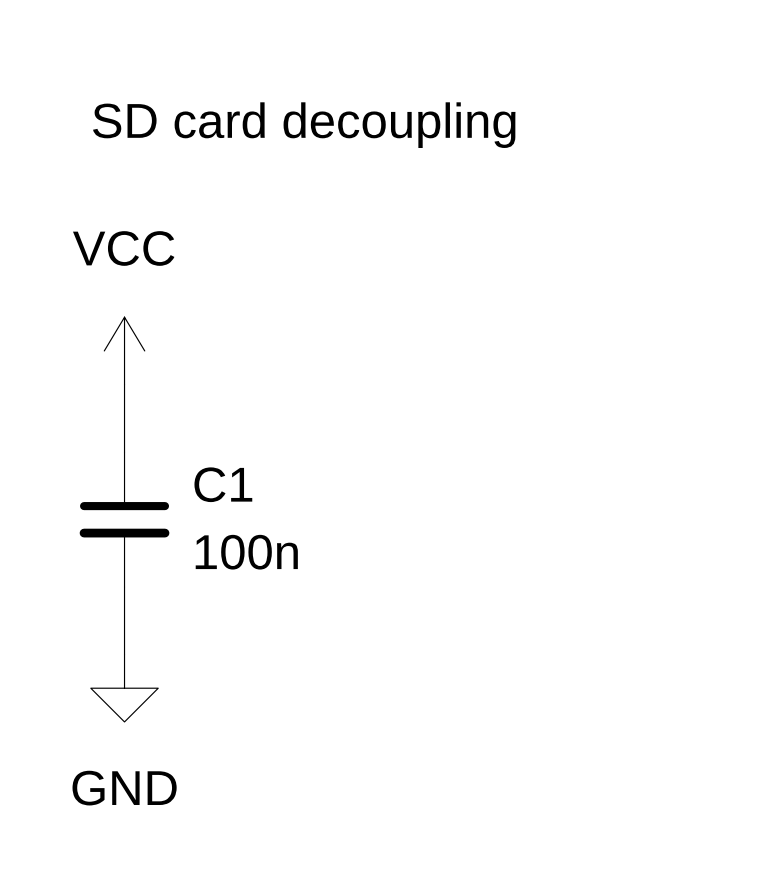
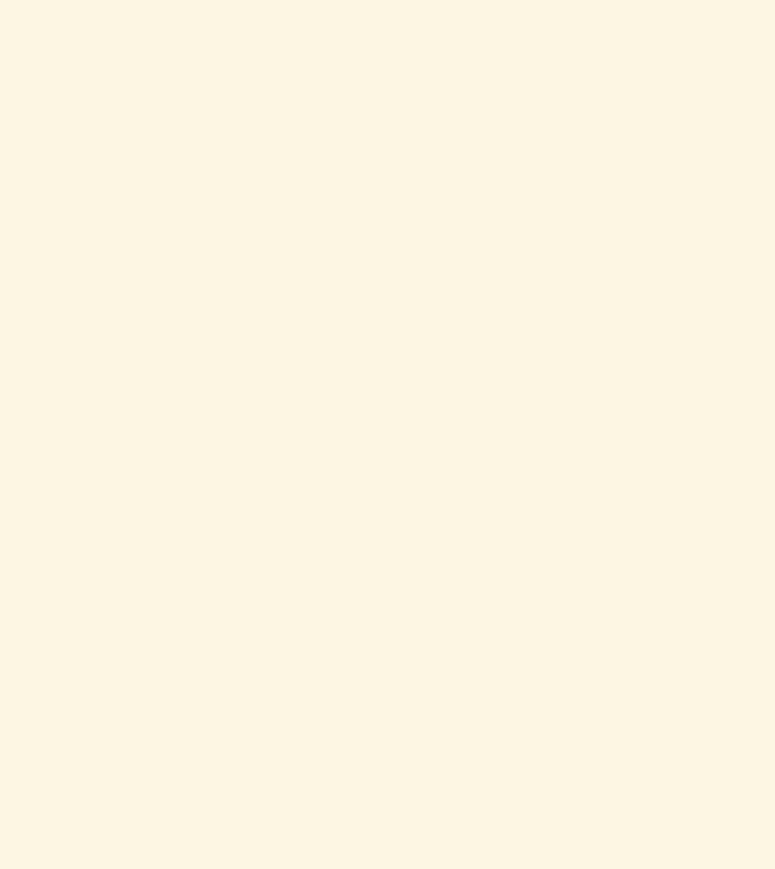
text: SD card decoupling (304, 125) -> none
power symbol: VCC (124, 350) -> none
wire: (124, 384) (124, 452) -> none
C1: 100n (124, 519) -> none
wire: (124, 587) (124, 654) -> none
power symbol: GND (124, 688) -> none

